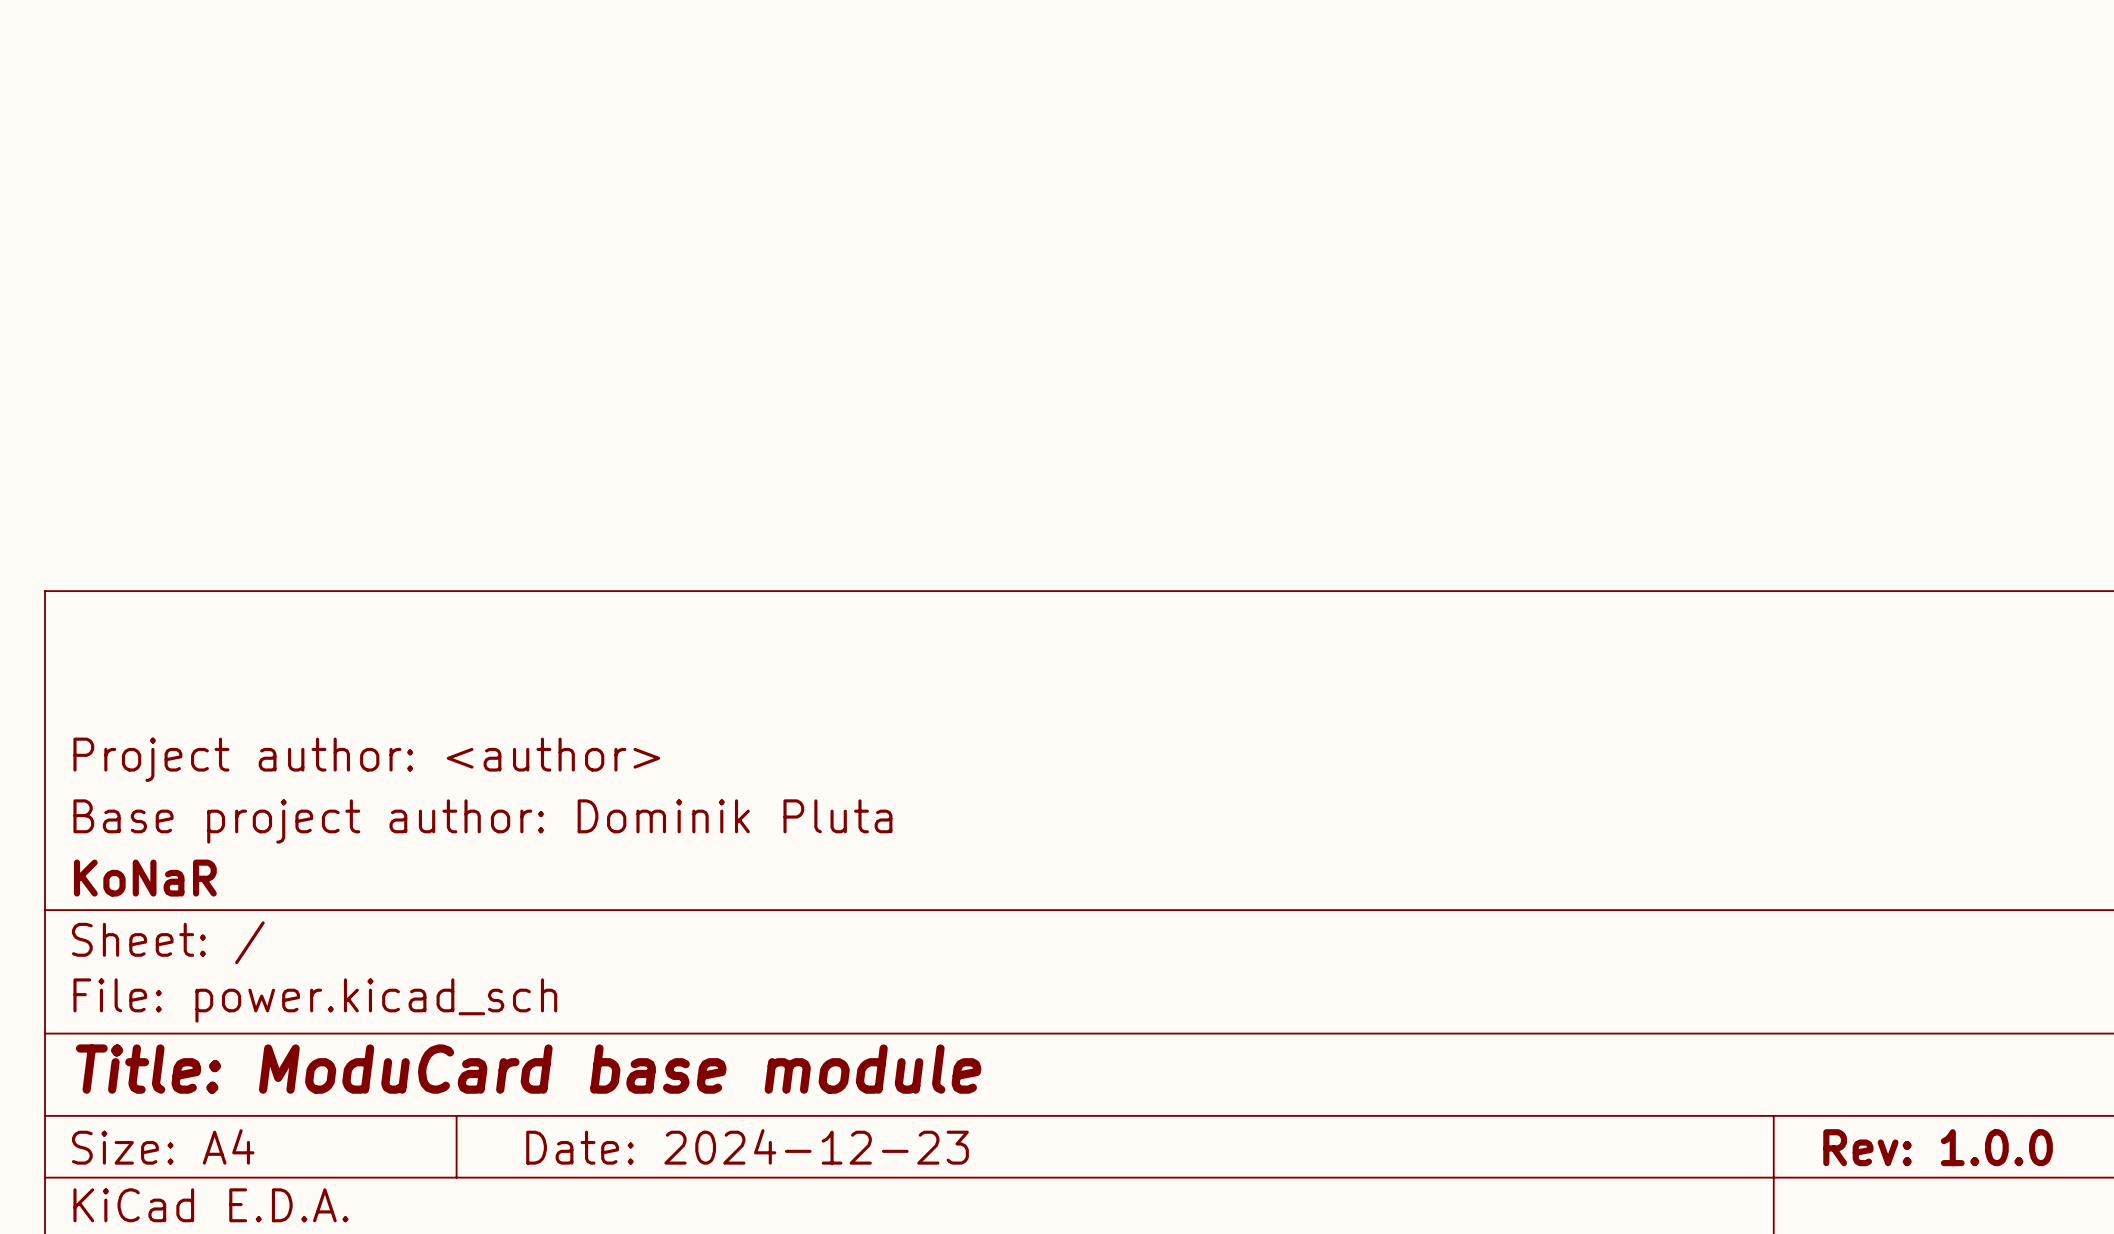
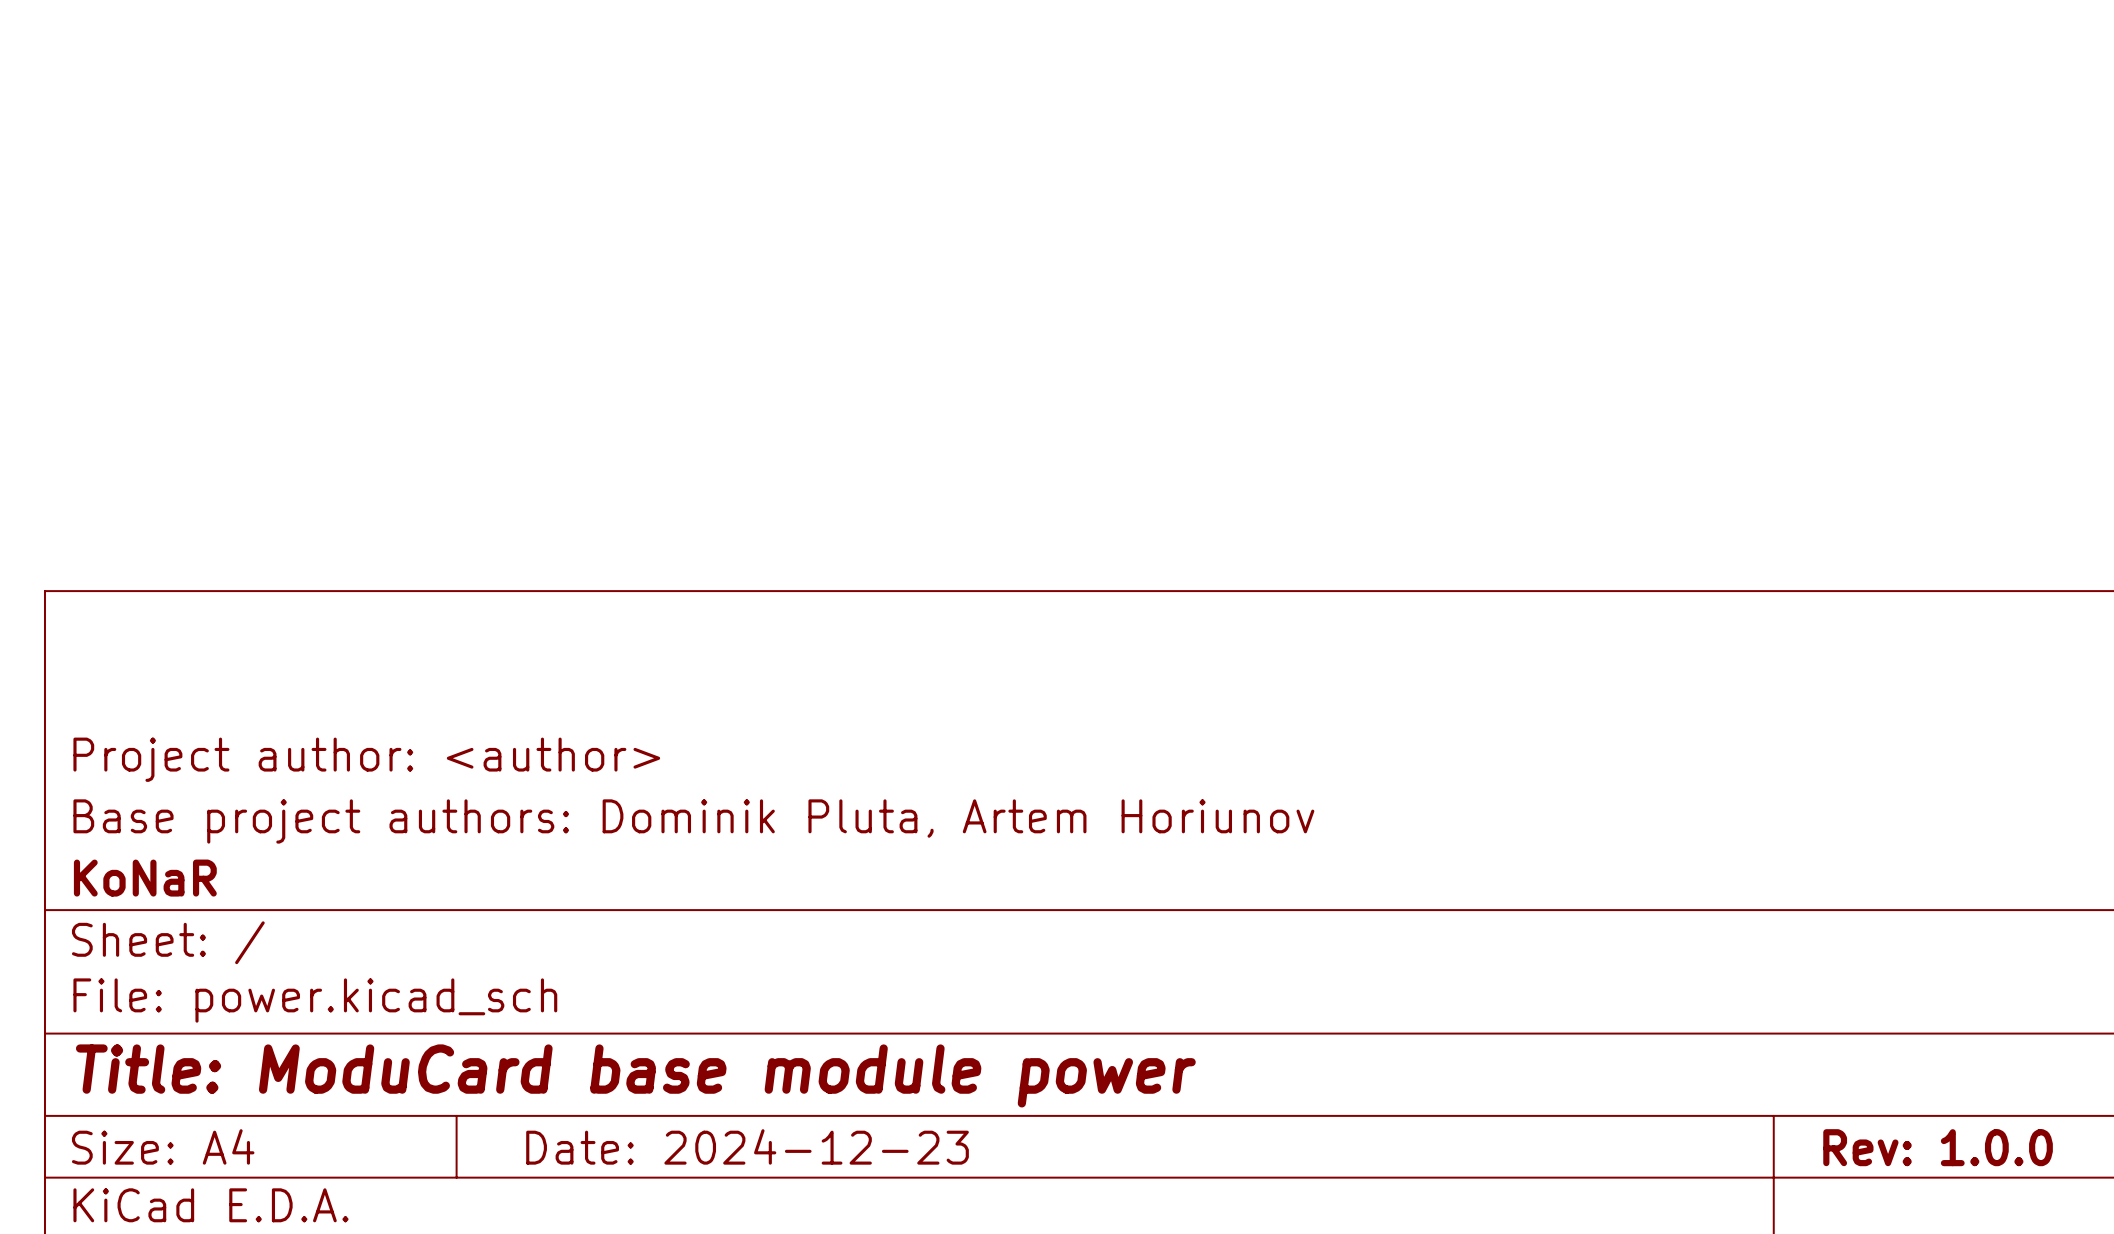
title block: Base project author: Dominik Pluta (482, 821) -> Base project authors: Dominik Pluta, Artem Horiunov (693, 821)
title block: Title: ModuCard base module (528, 1069) -> Title: ModuCard base module power (635, 1075)

